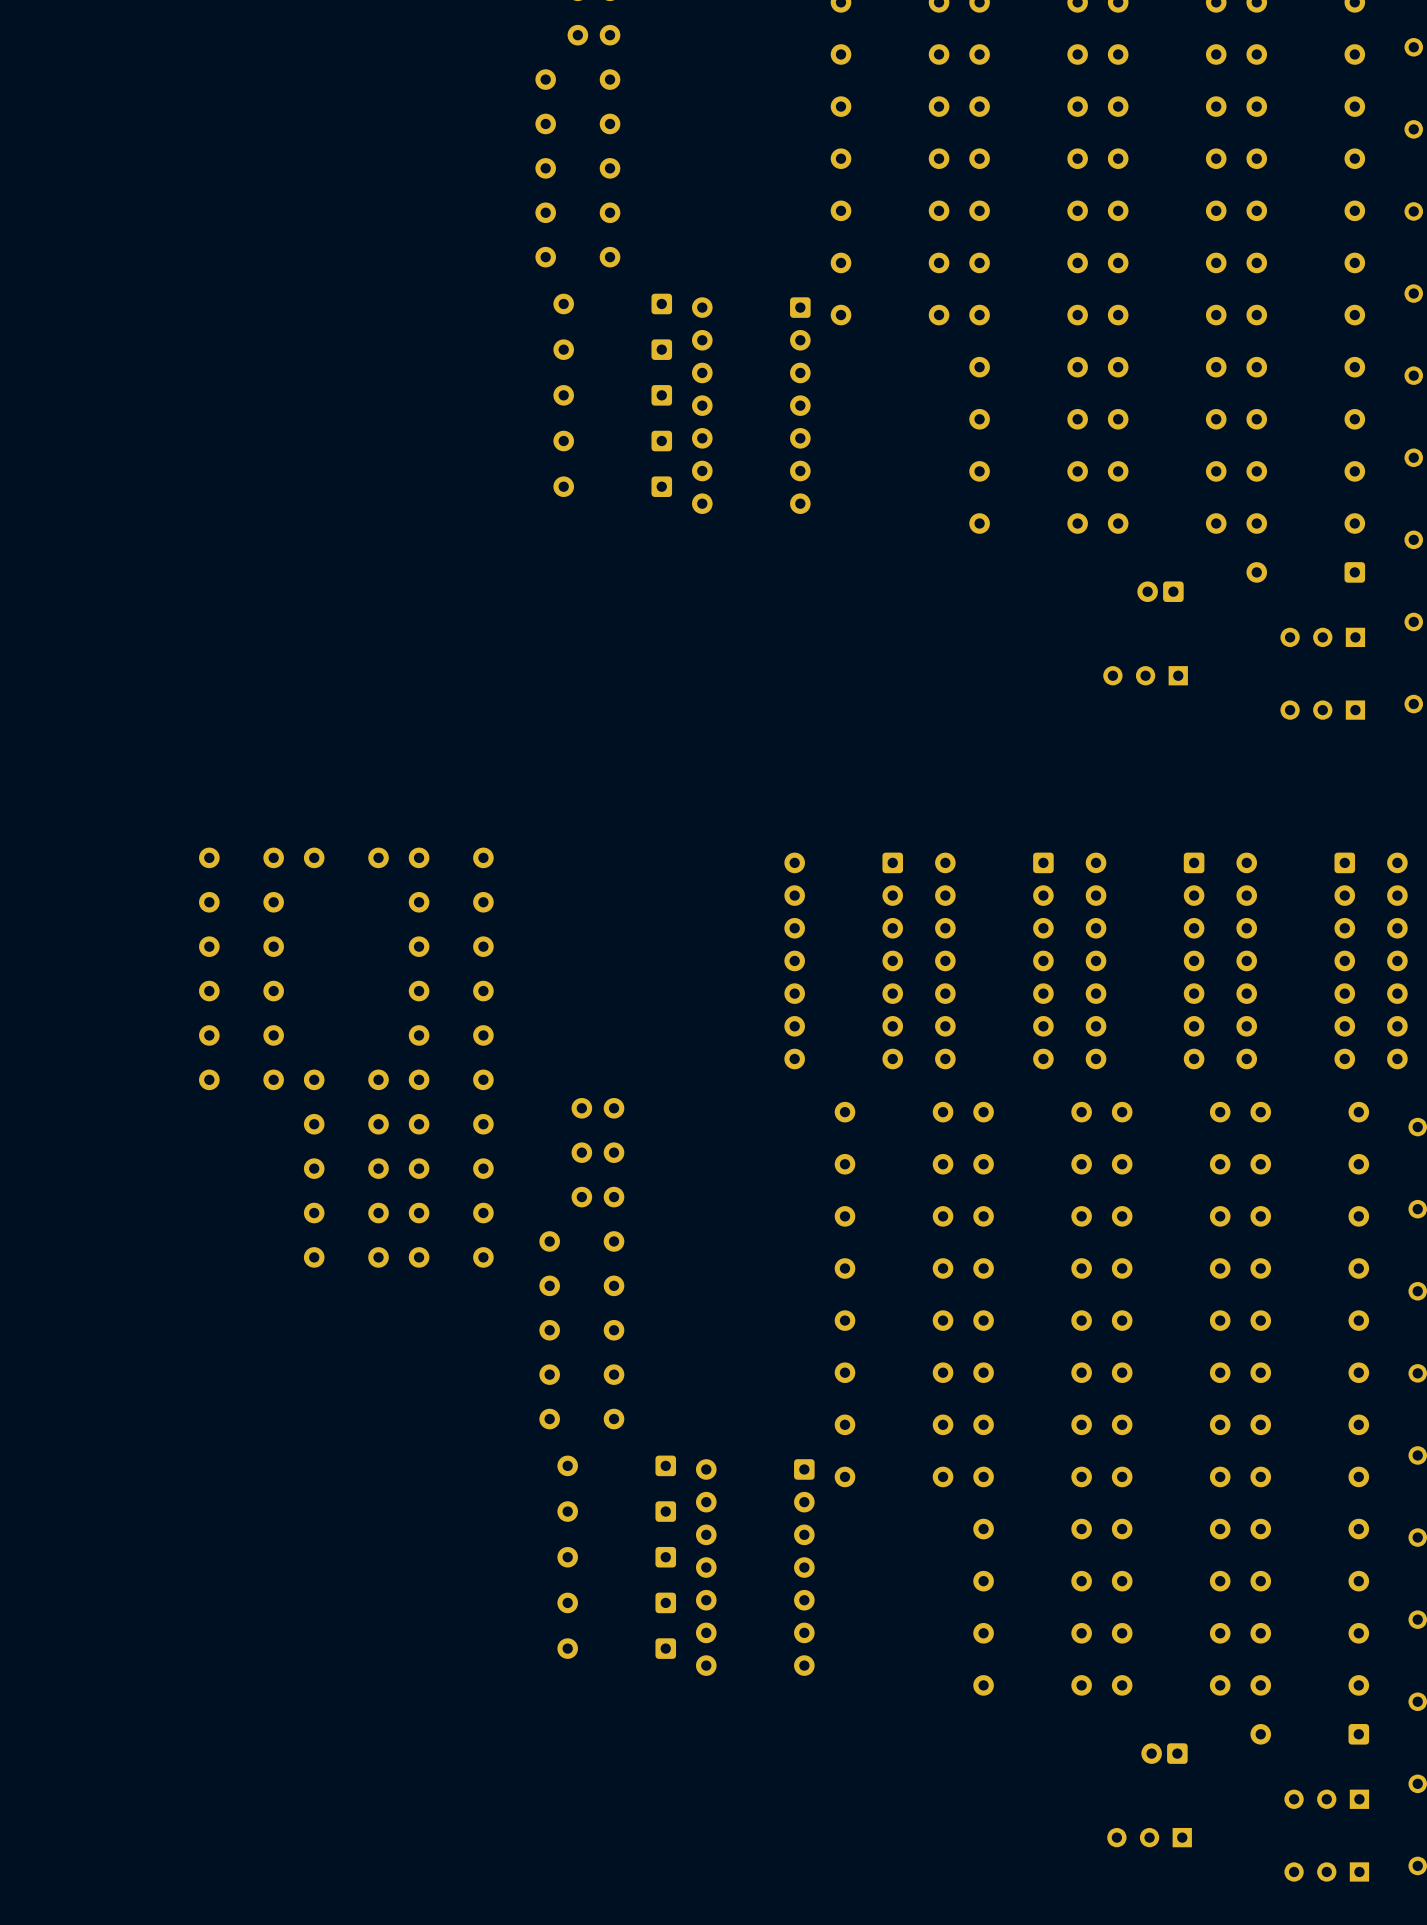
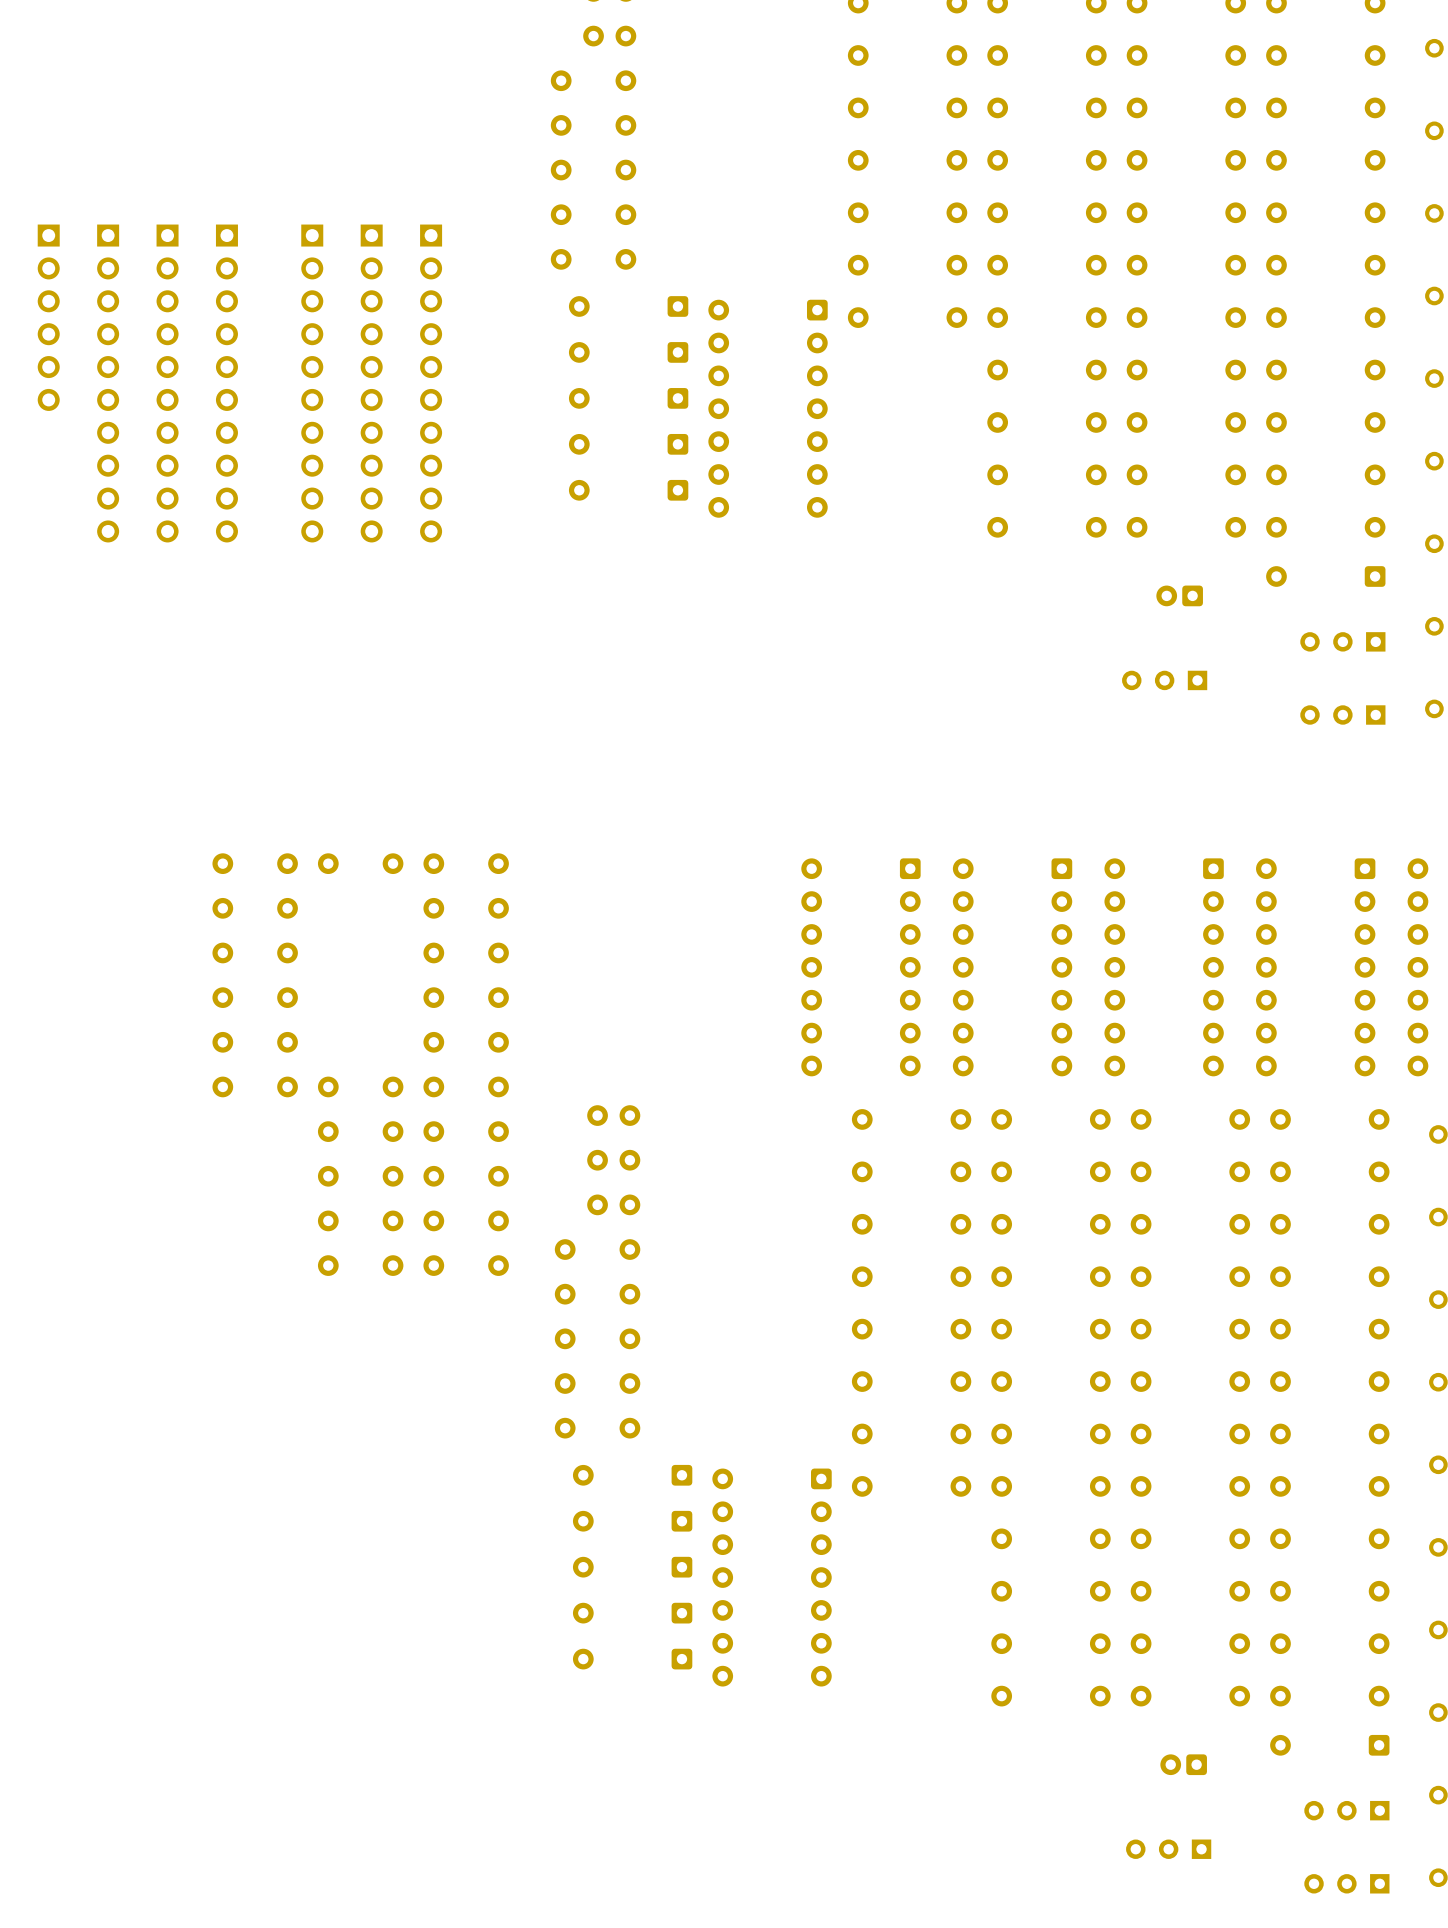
part: none -> (48, 317)
part: none -> (108, 383)
part: none -> (167, 383)
part: none -> (226, 383)
part: none -> (312, 383)
part: none -> (371, 383)
part: none -> (431, 383)

